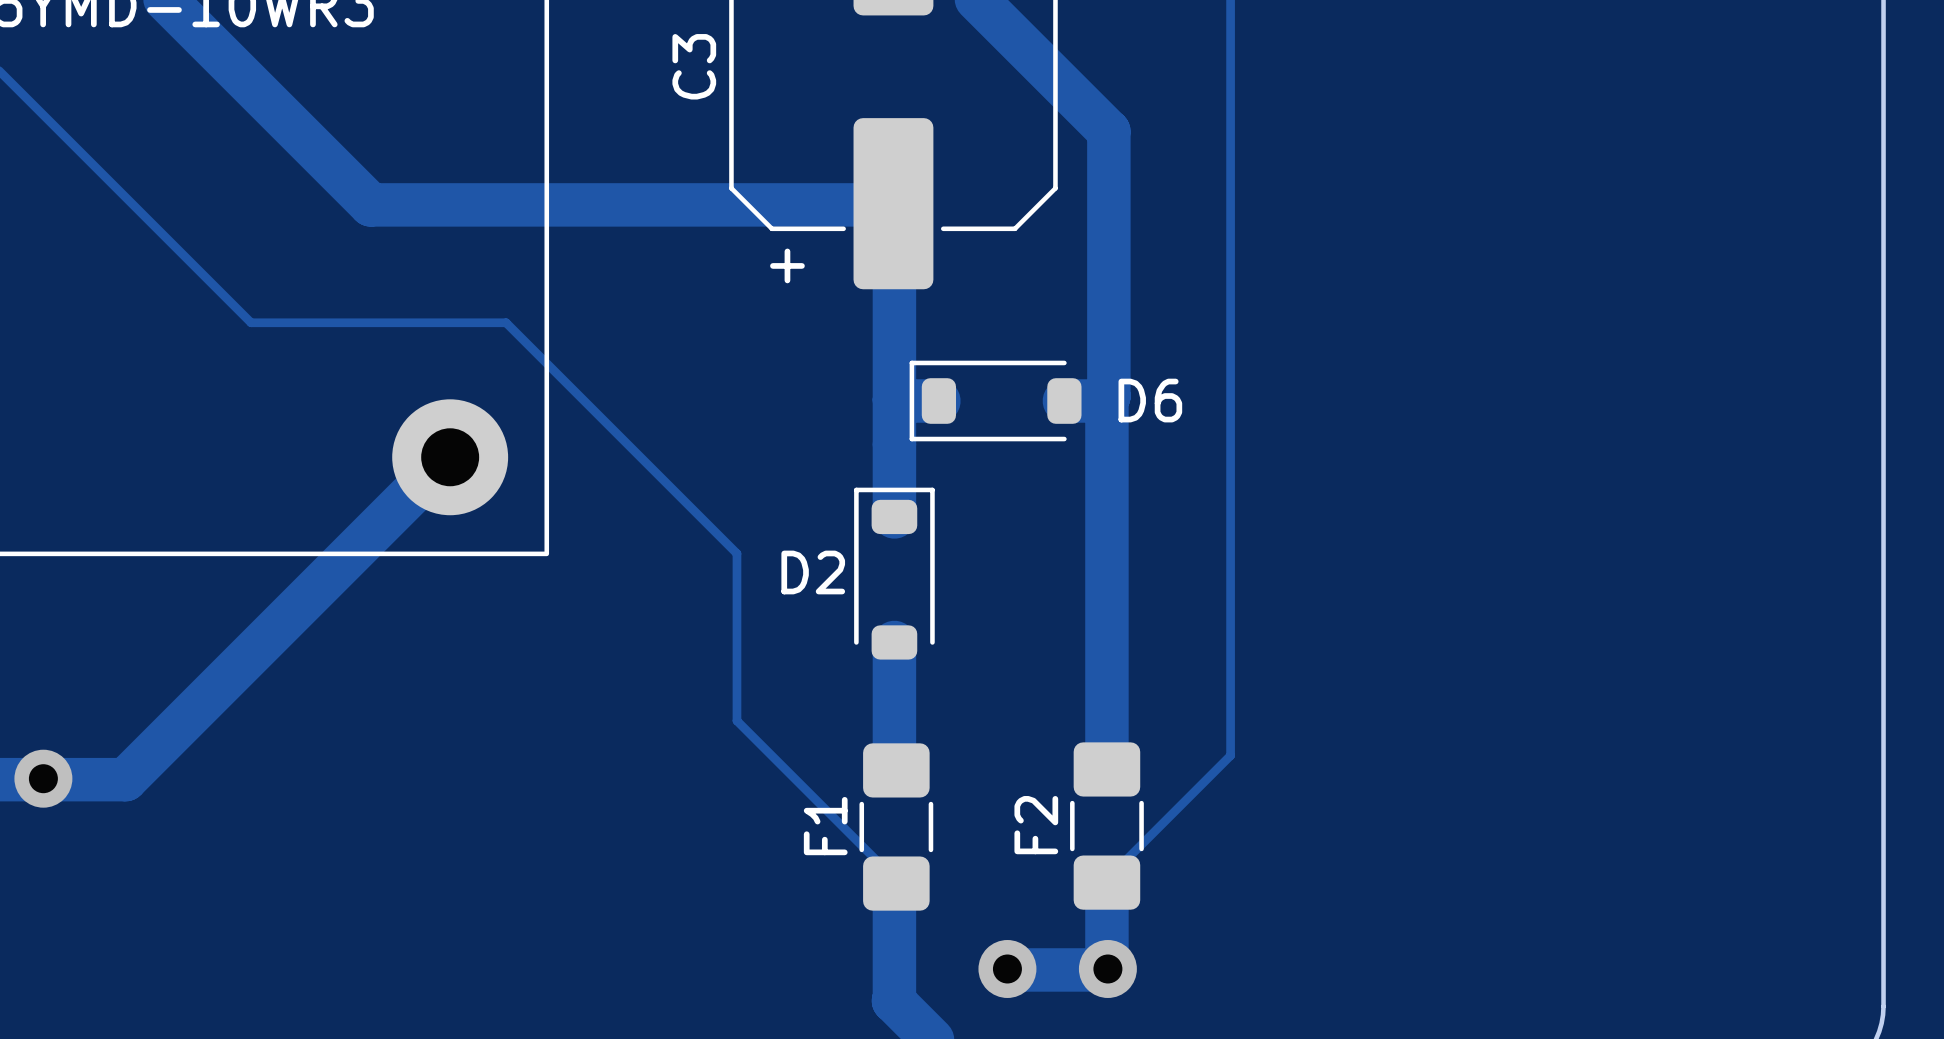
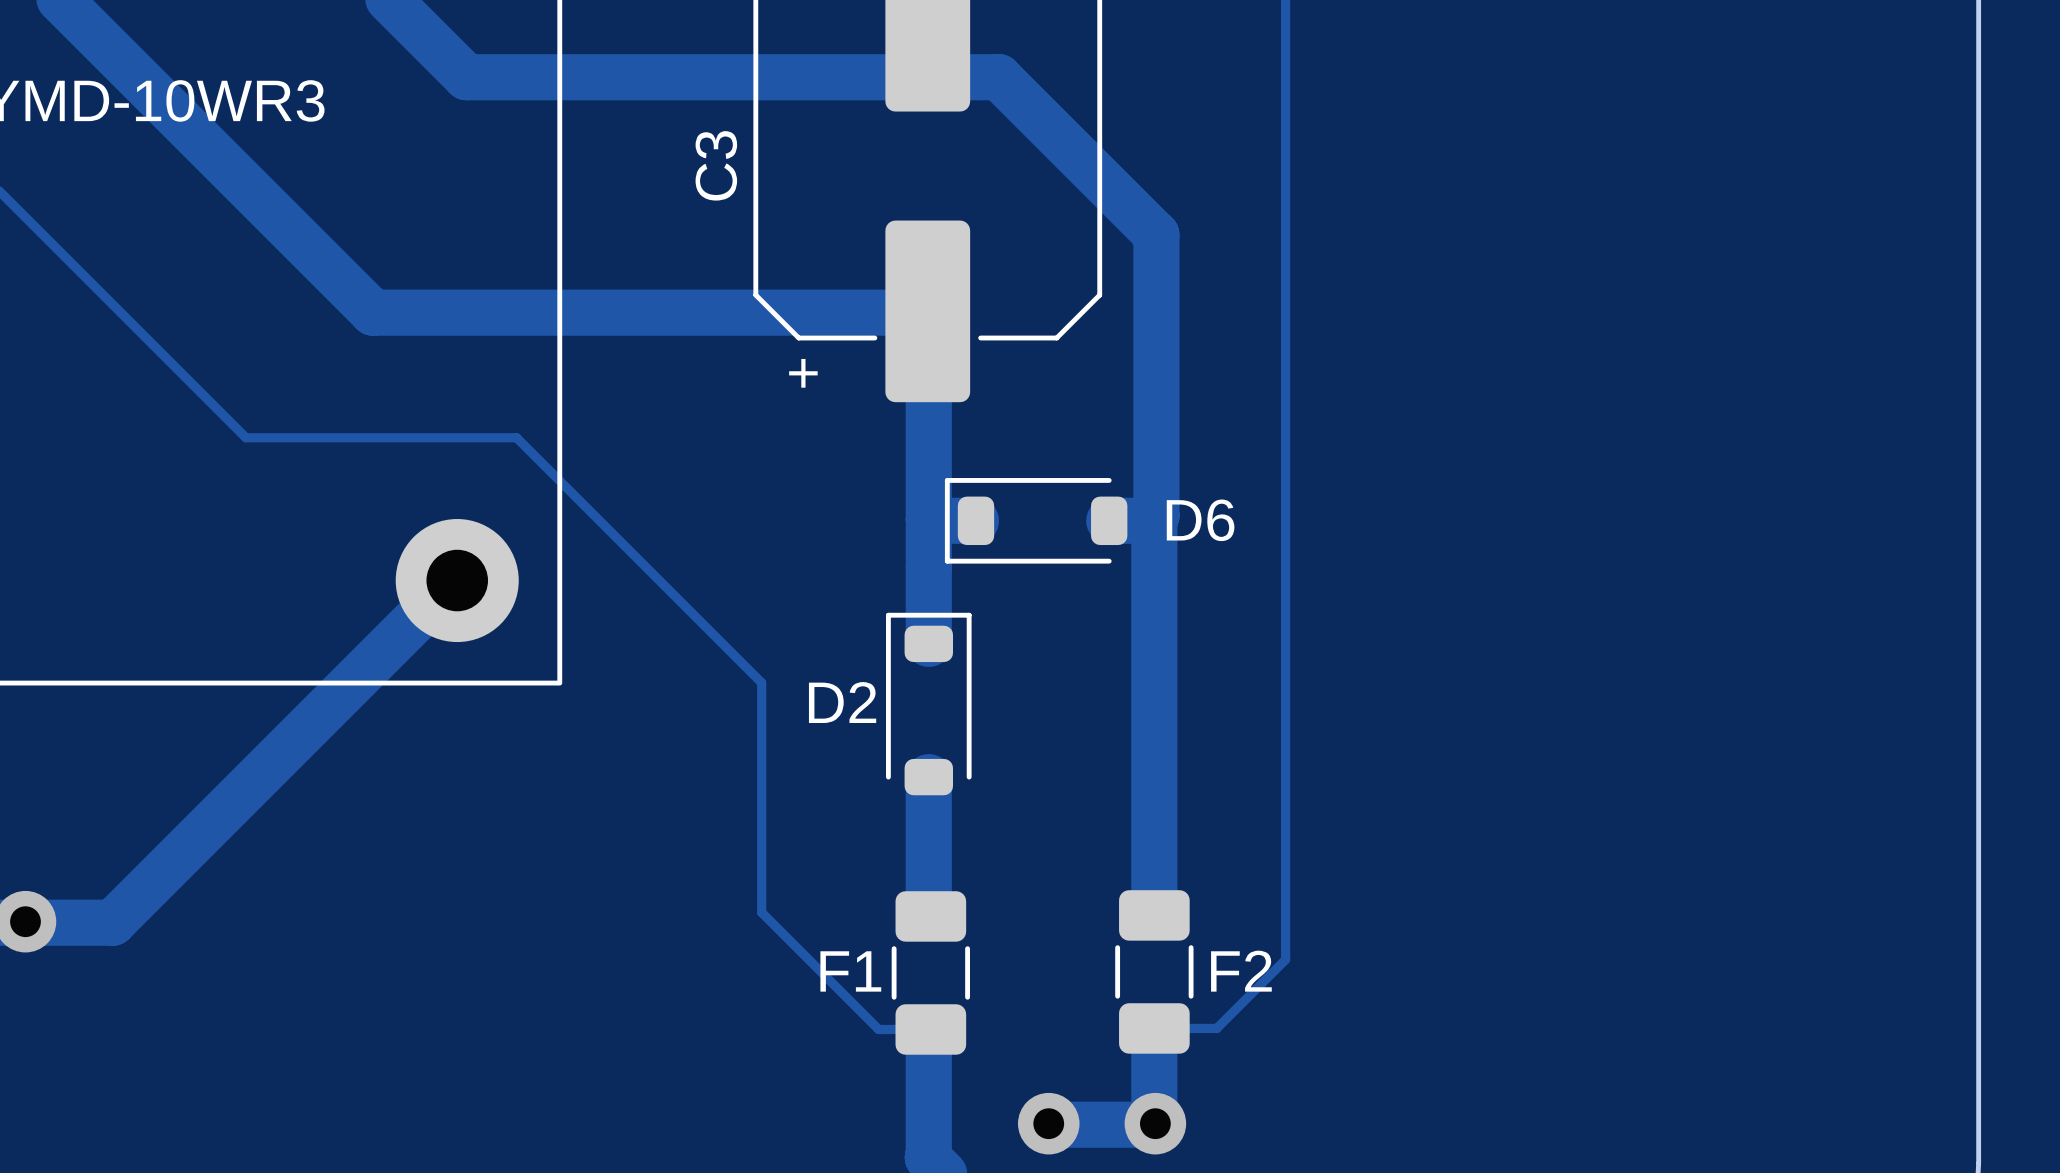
track: (736, 720) (896, 880) -> (761, 860) (761, 912) (878, 1029) (930, 1029)
F2 footprint: [1070, 742, 1144, 910] -> [1115, 890, 1194, 1054]
F1 footprint: [859, 743, 934, 911] -> [891, 891, 970, 1055]
track: (1230, 755) (1106, 879) -> (1285, 897) (1285, 959) (1216, 1028) (1154, 1028)
F2 name rotation: 0° (1036, 825) -> 90° clockwise (1241, 971)
F2 name position: F2 (1036, 825) -> F2 (1241, 971)
F1 name rotation: 0° (825, 826) -> 90° clockwise (850, 971)

